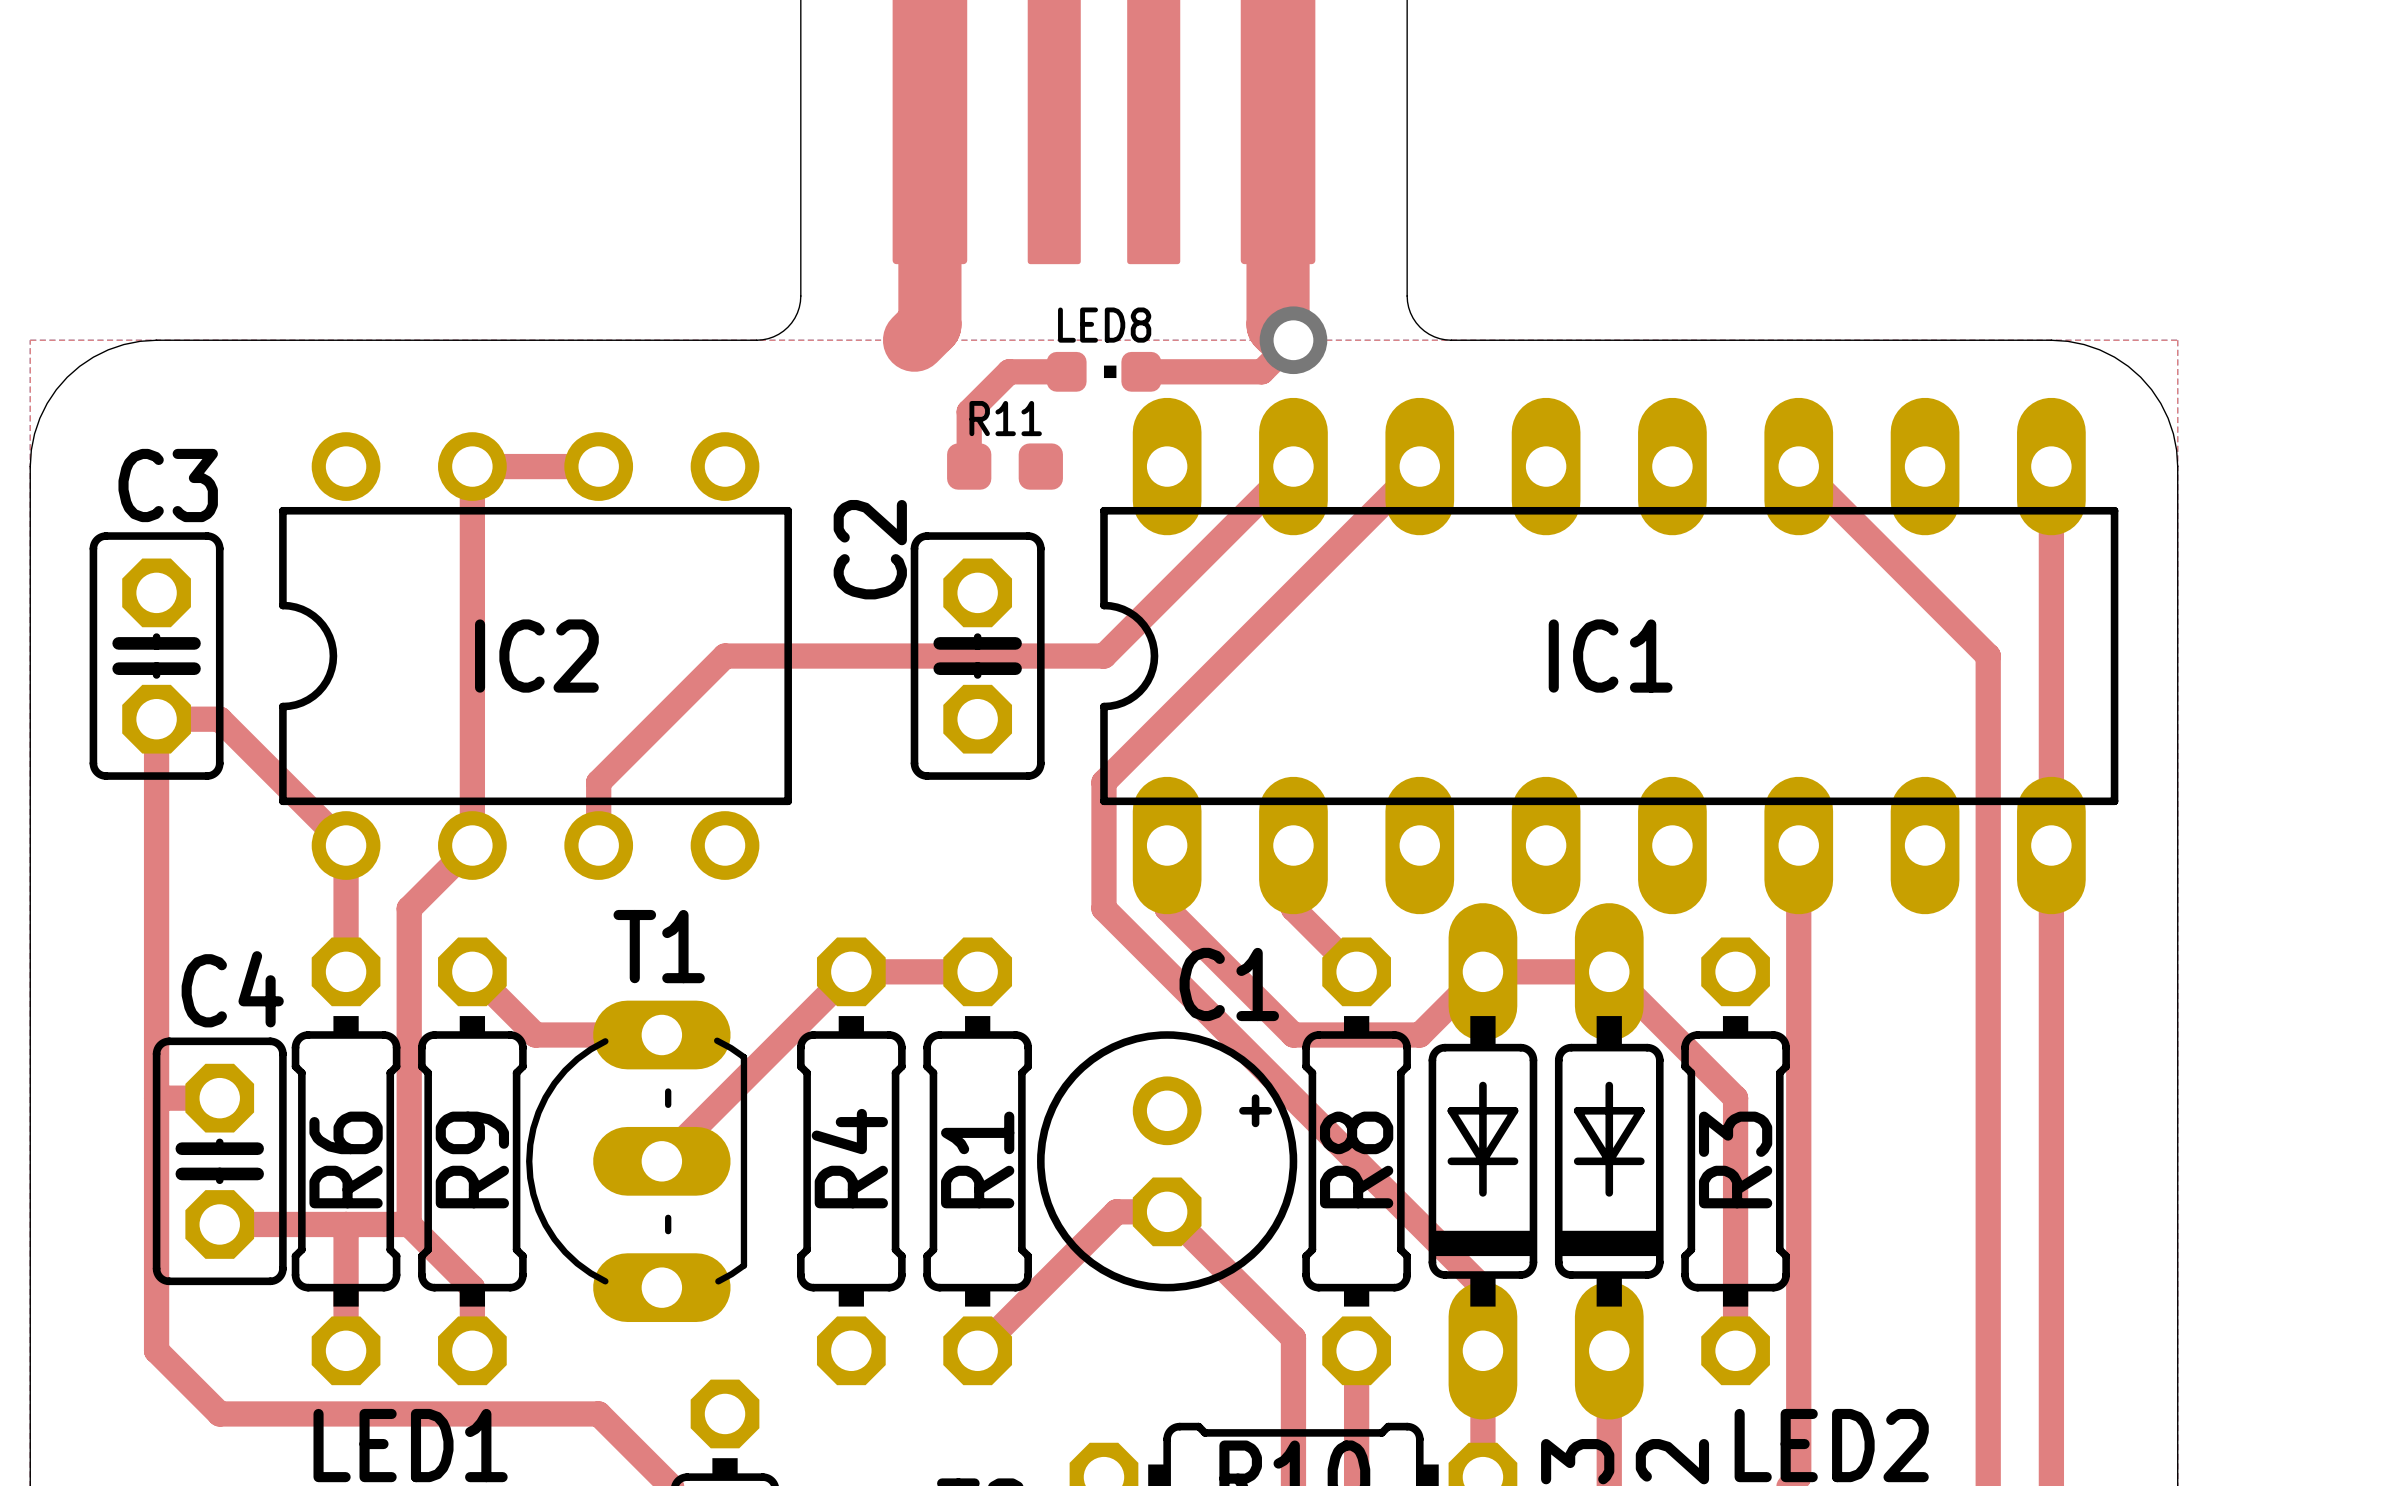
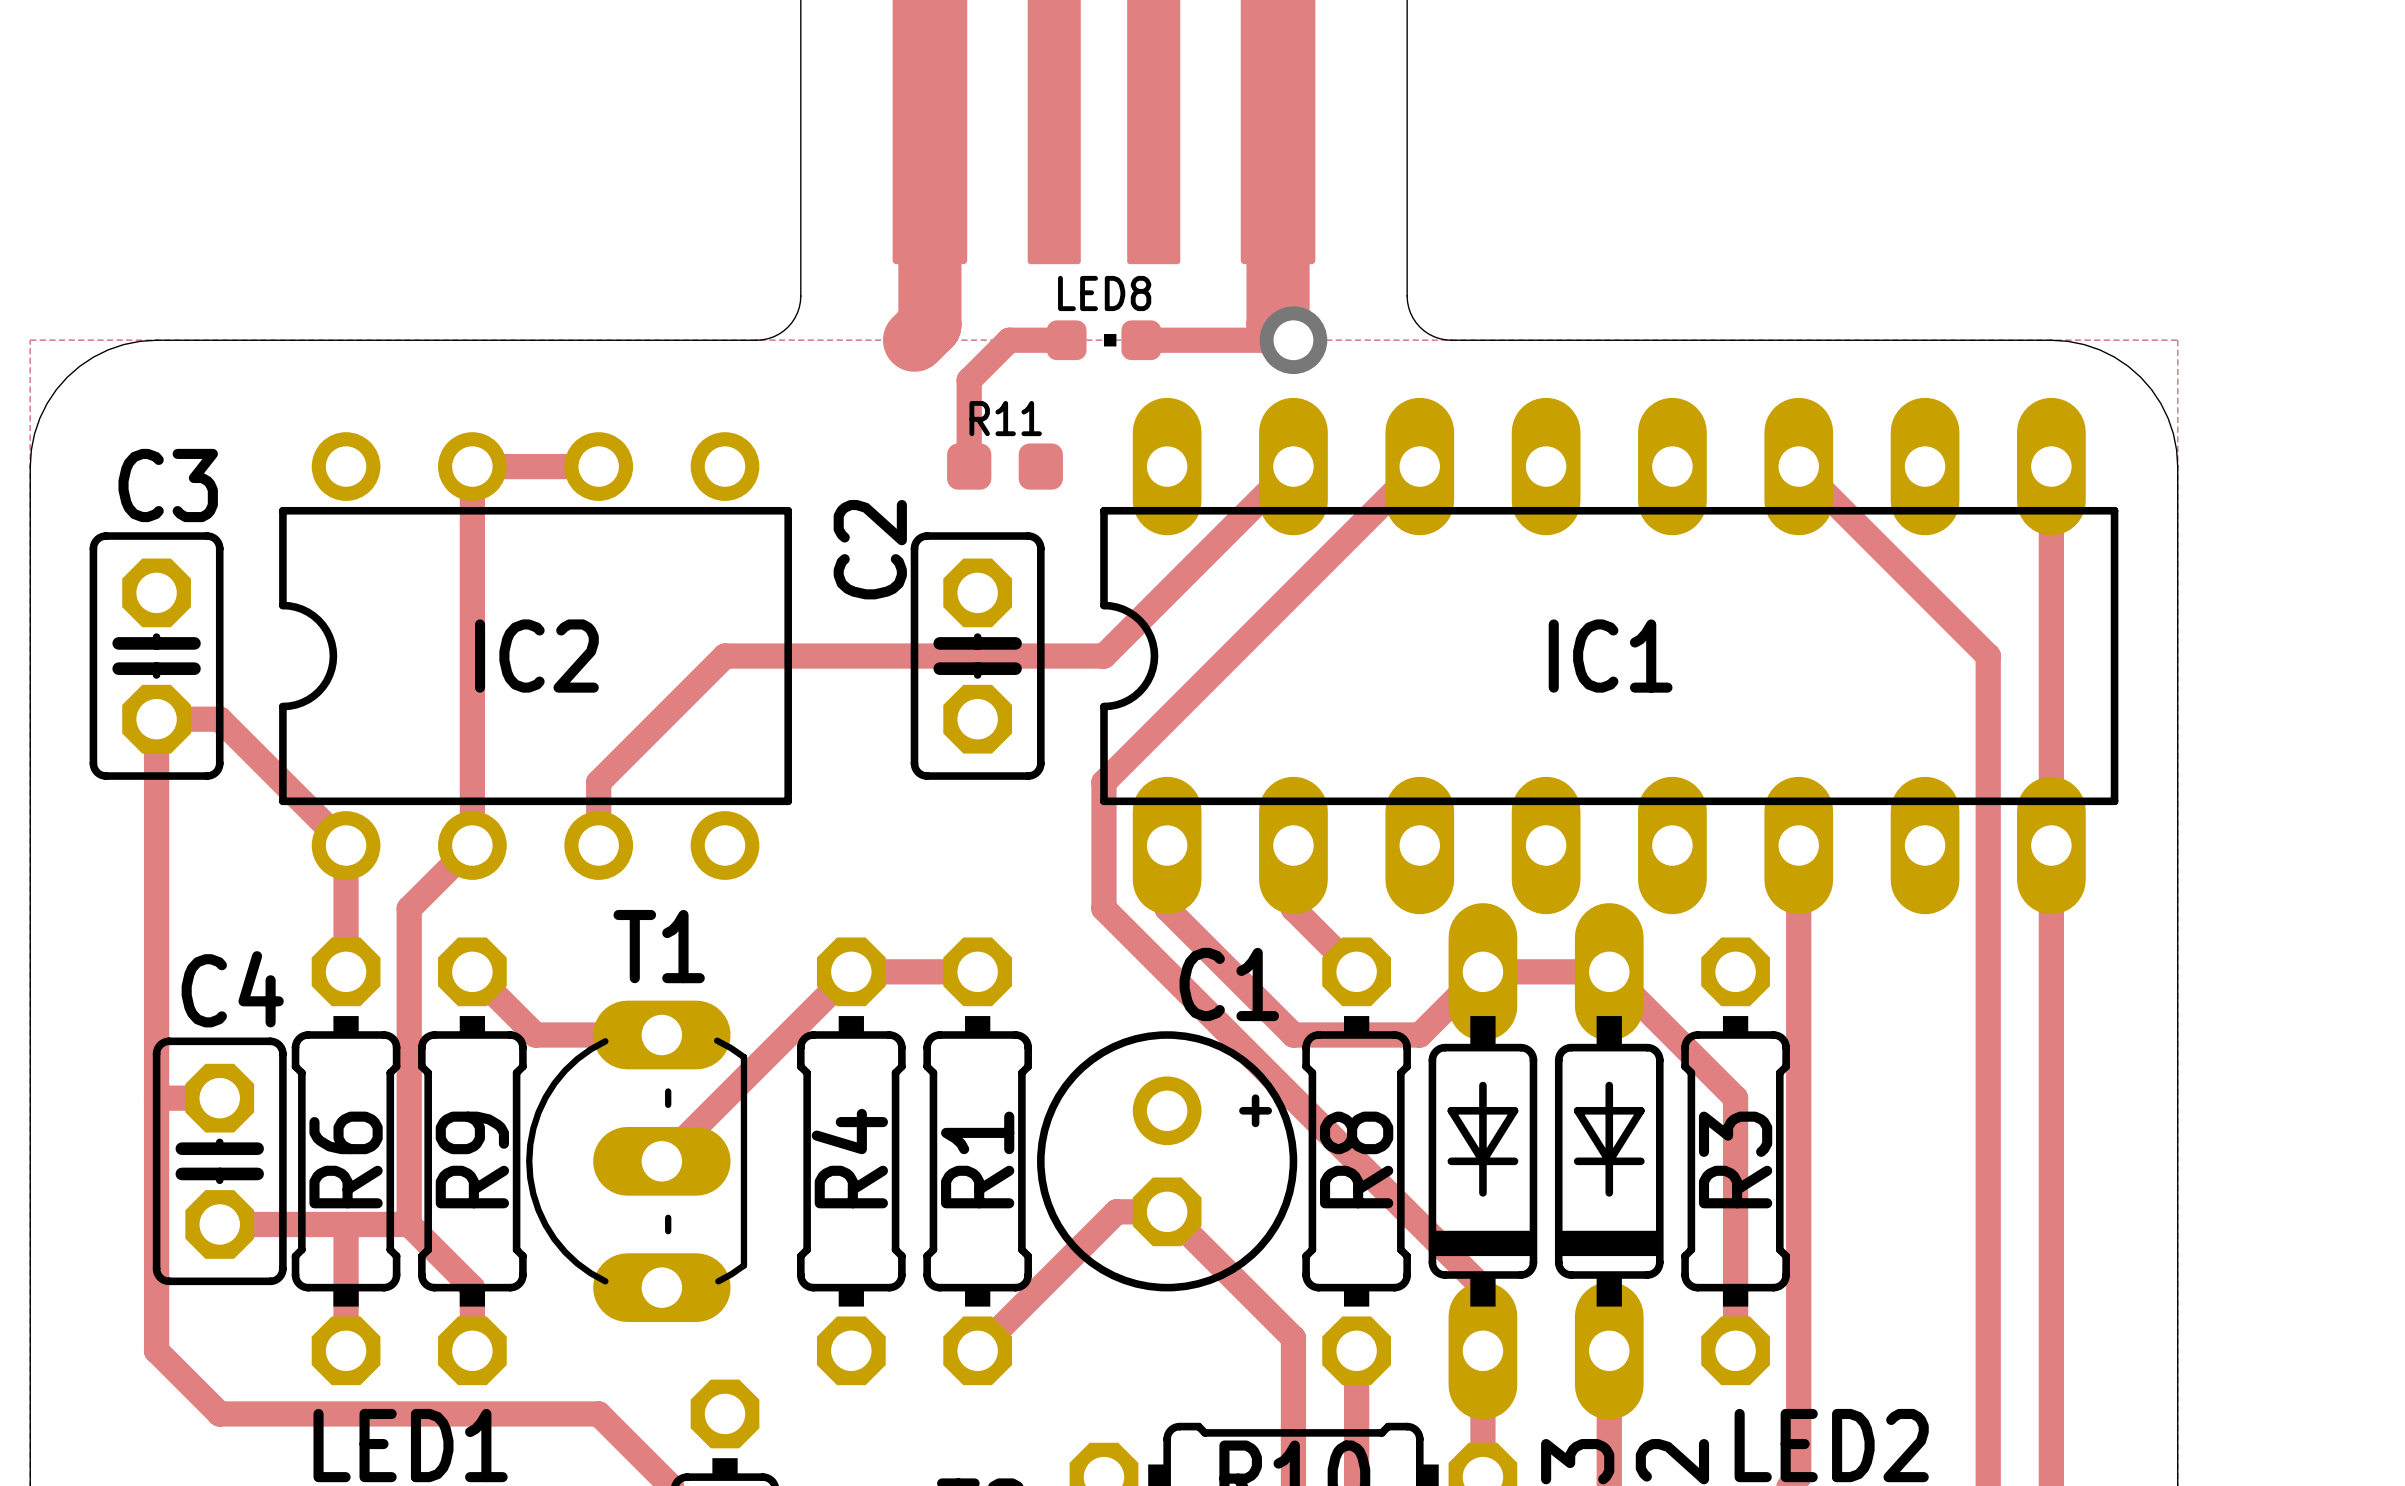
top track: (1293, 340) (1261, 371) (1141, 371) -> (1293, 340) (1141, 340)
top track: (1066, 371) (1009, 371) (969, 411) -> (1066, 340) (1009, 340) (969, 380) (969, 411)
LED8 position: (1103, 371) -> (1103, 340)

